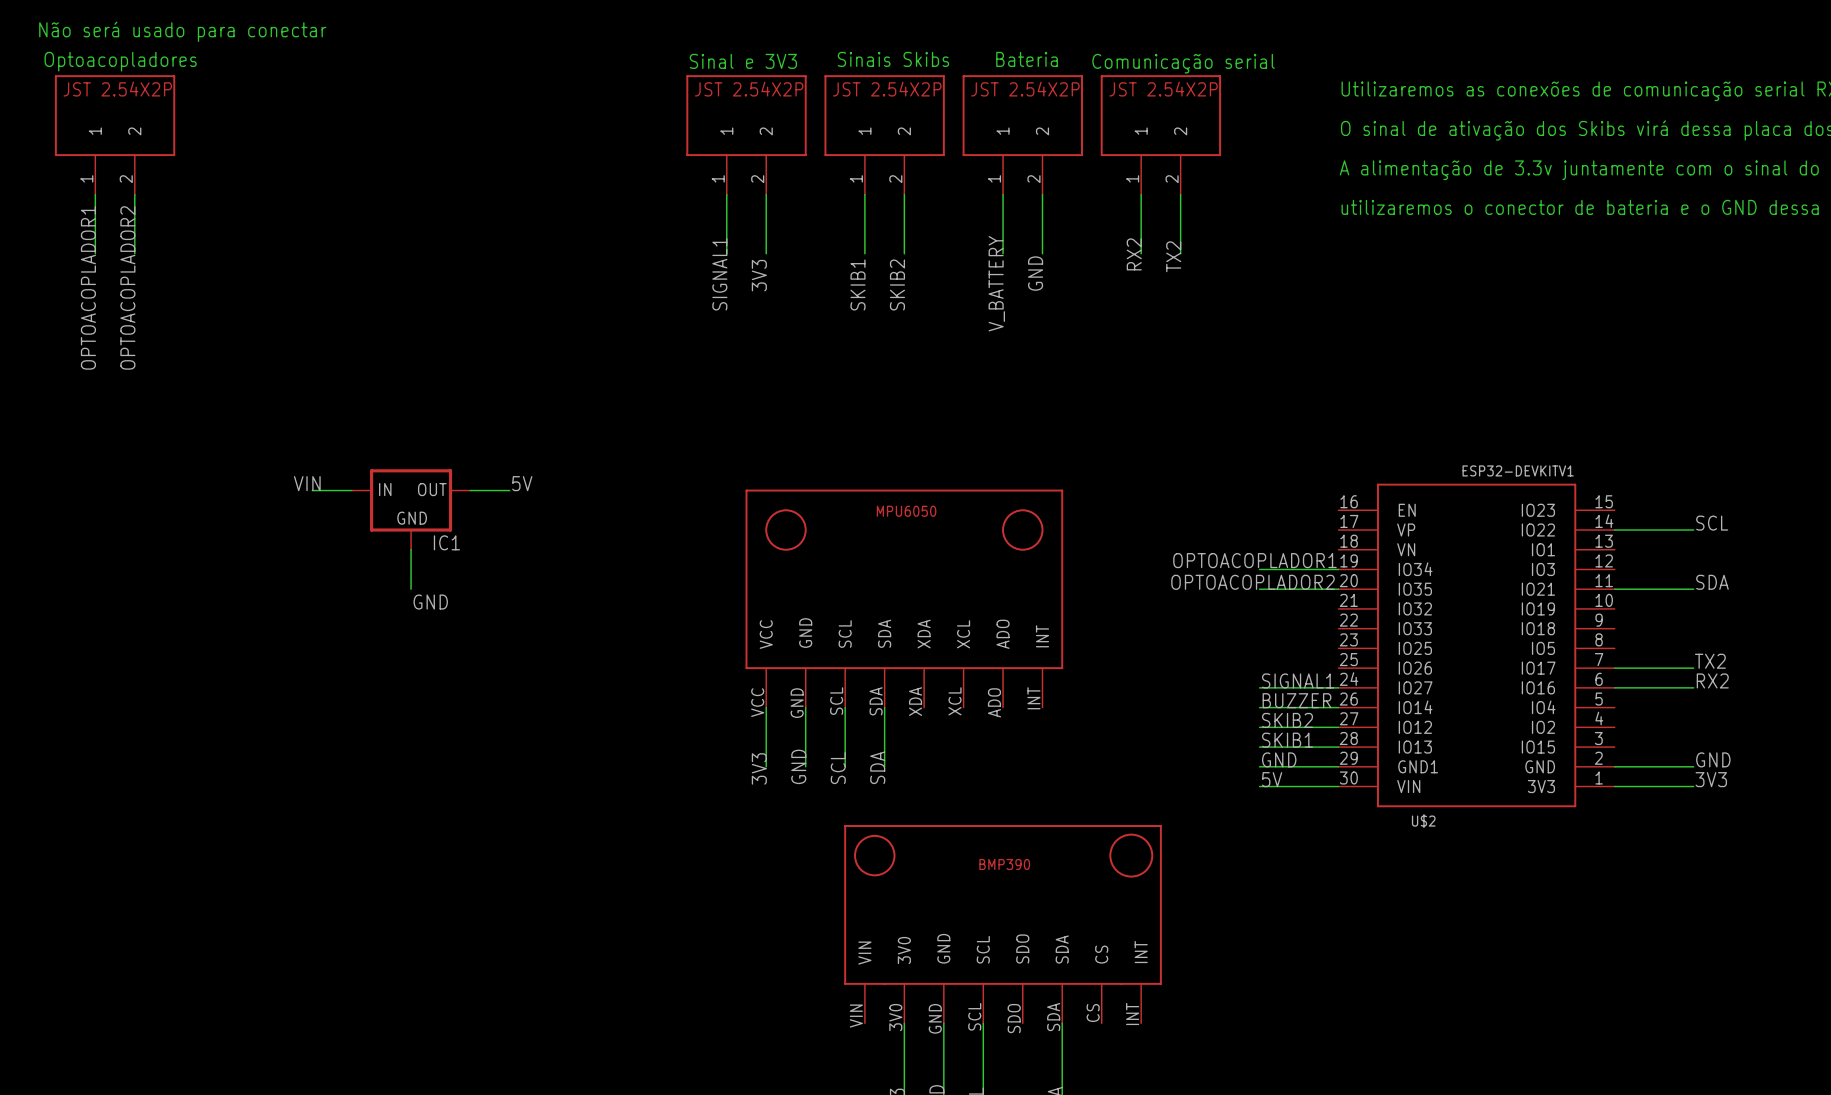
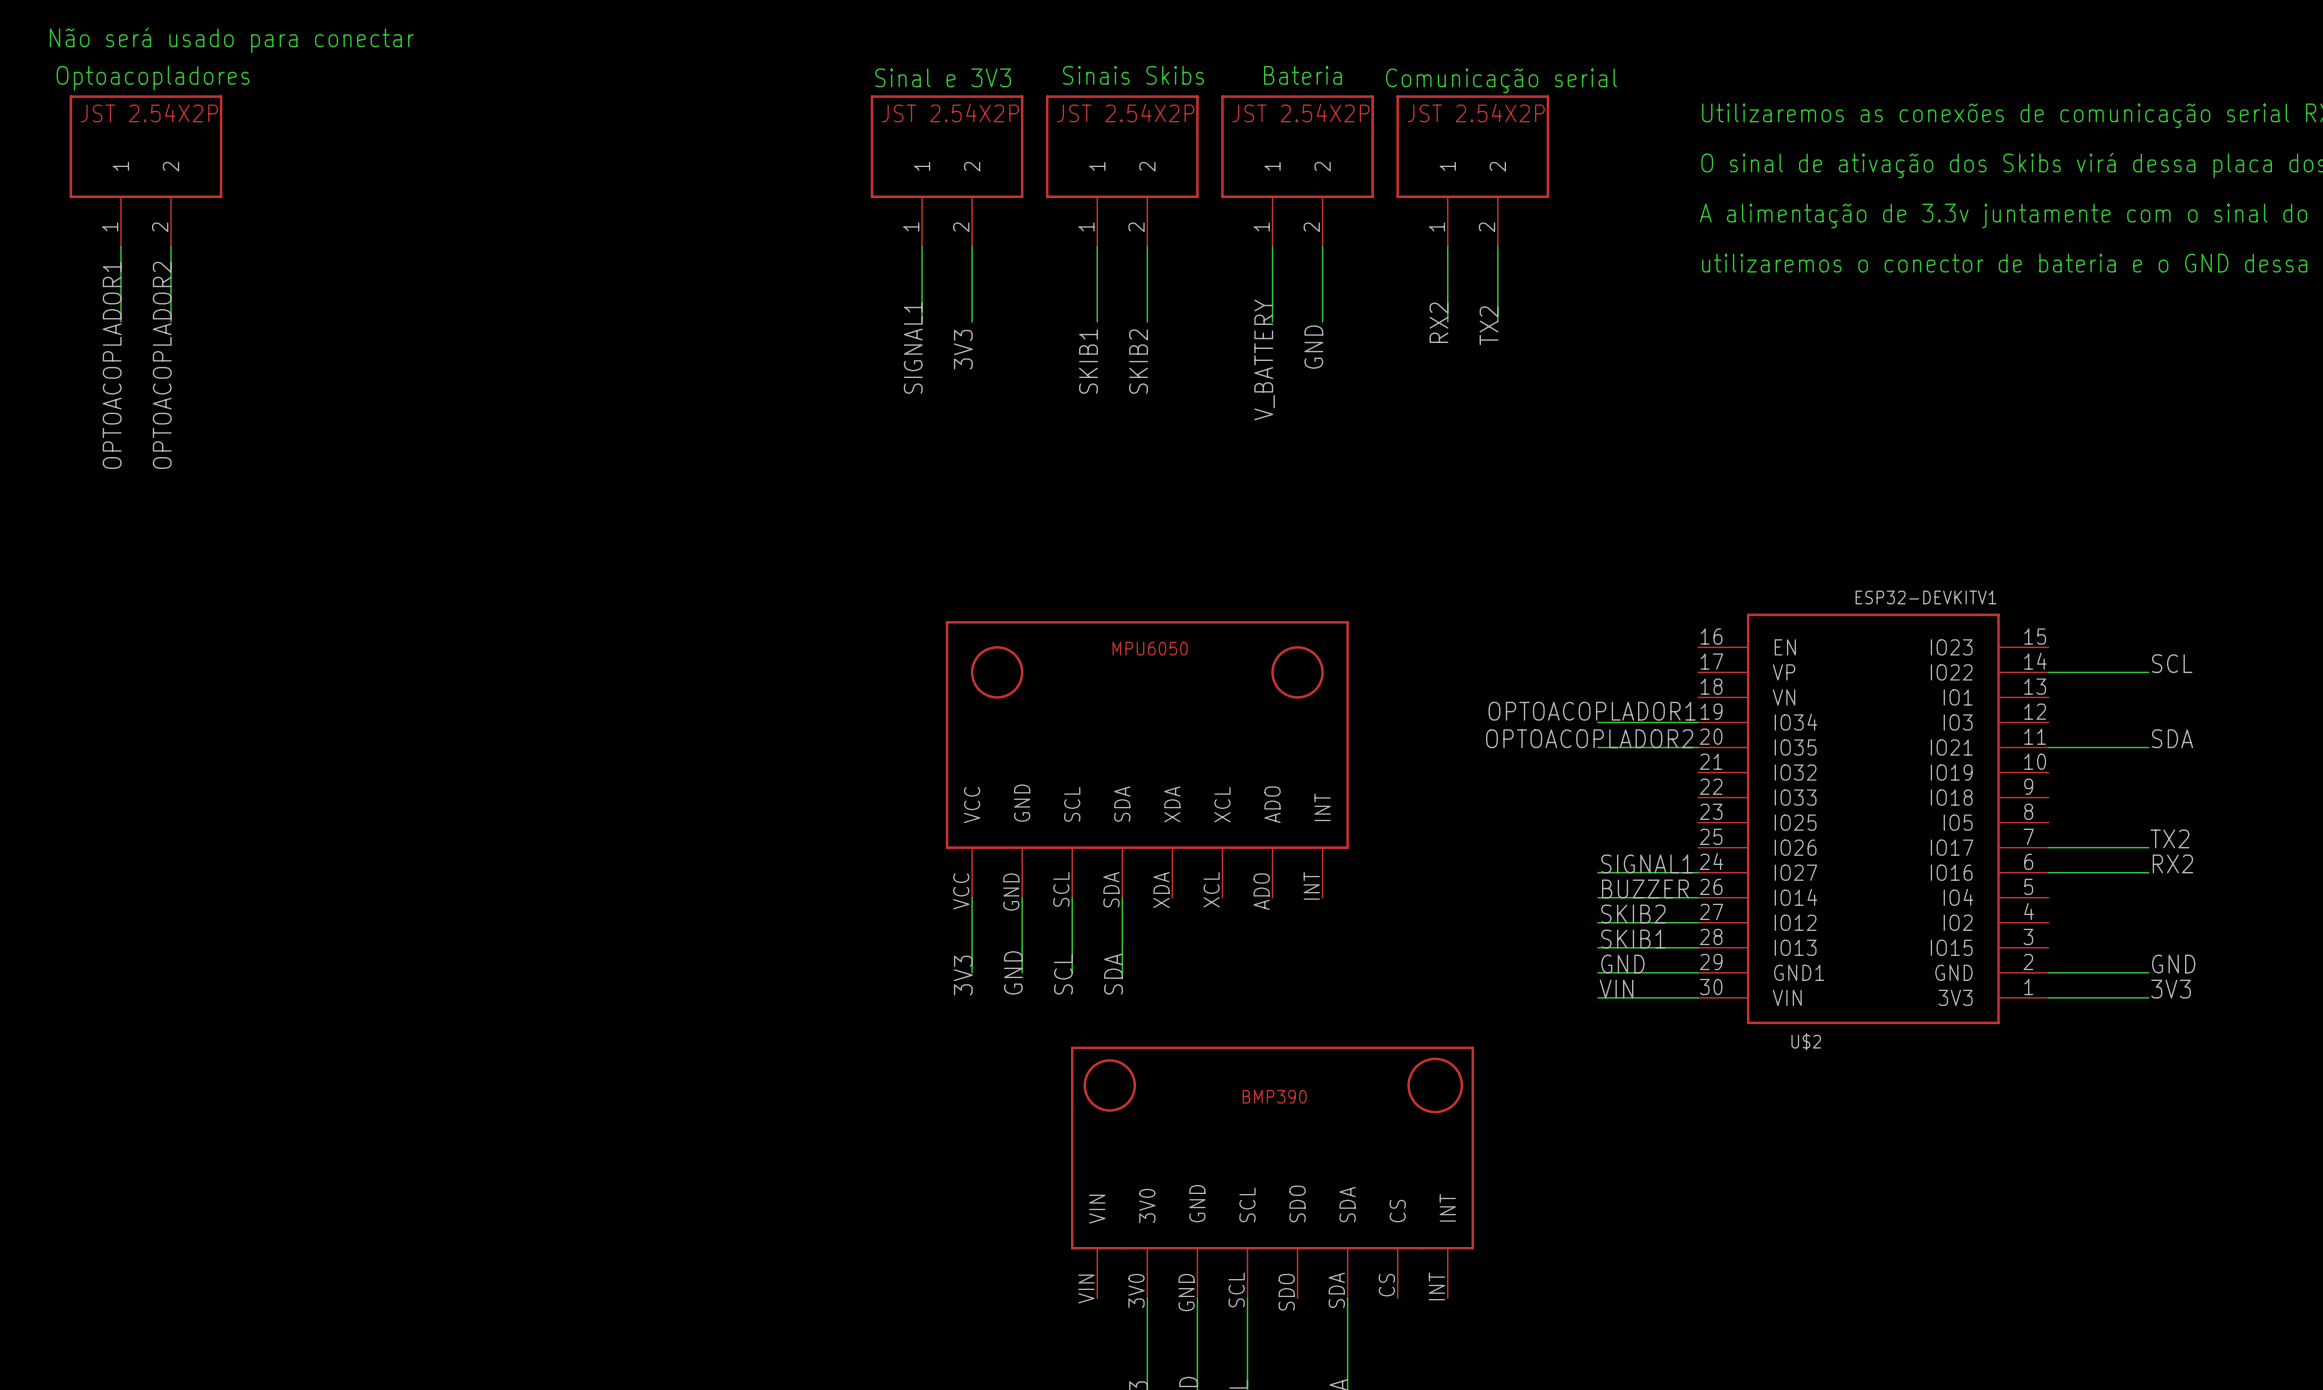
label: VIN (307, 483) -> none
label: 5V (522, 483) -> none
wire: (312, 490) (351, 490) -> none
wire: (470, 490) (509, 490) -> none
IC1: (411, 509) -> none
wire: (411, 549) (411, 589) -> none
label: GND (430, 602) -> none
label: 5V (1272, 779) -> VIN (1616, 989)

